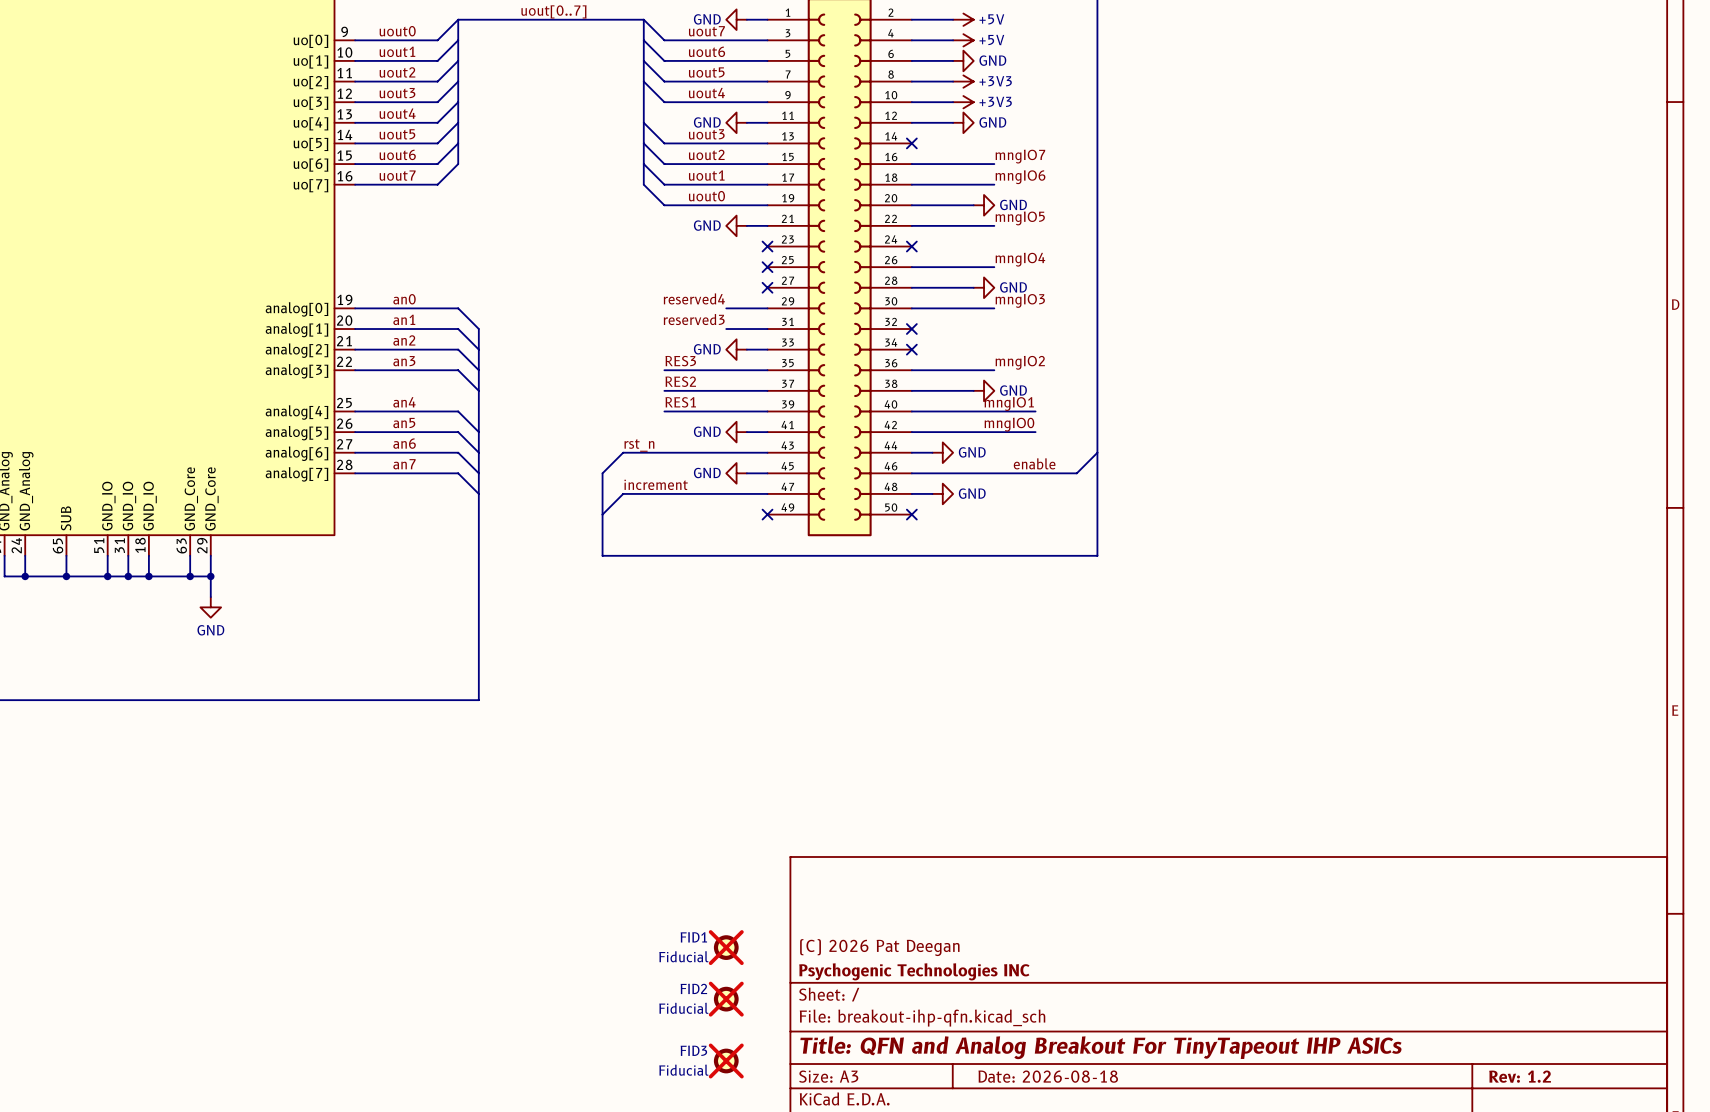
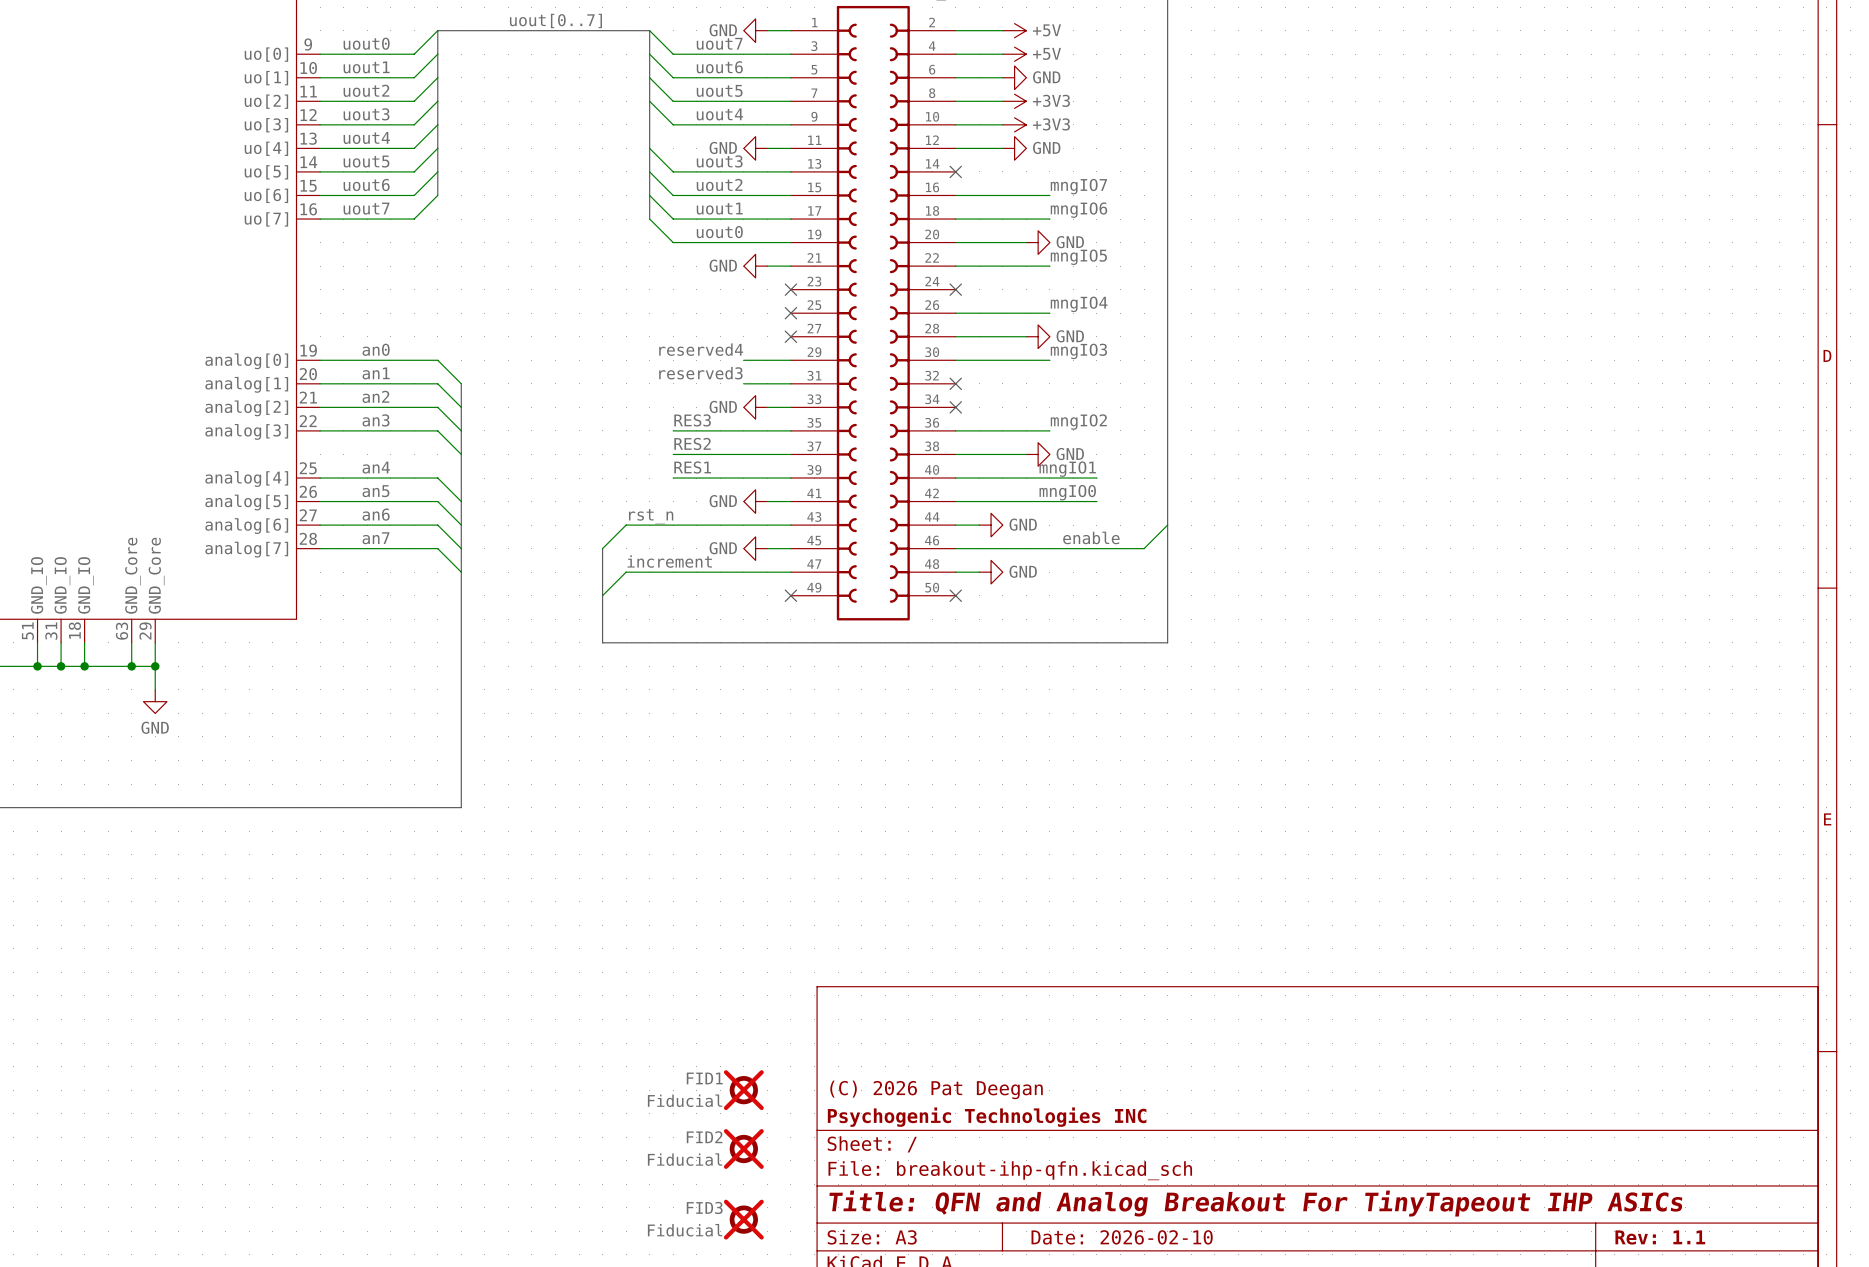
title block: Date: 2026-08-18 (1048, 1076) -> Date: 2026-02-10 (1122, 1237)
title block: Rev: 1.2 (1520, 1076) -> Rev: 1.1 (1660, 1237)

